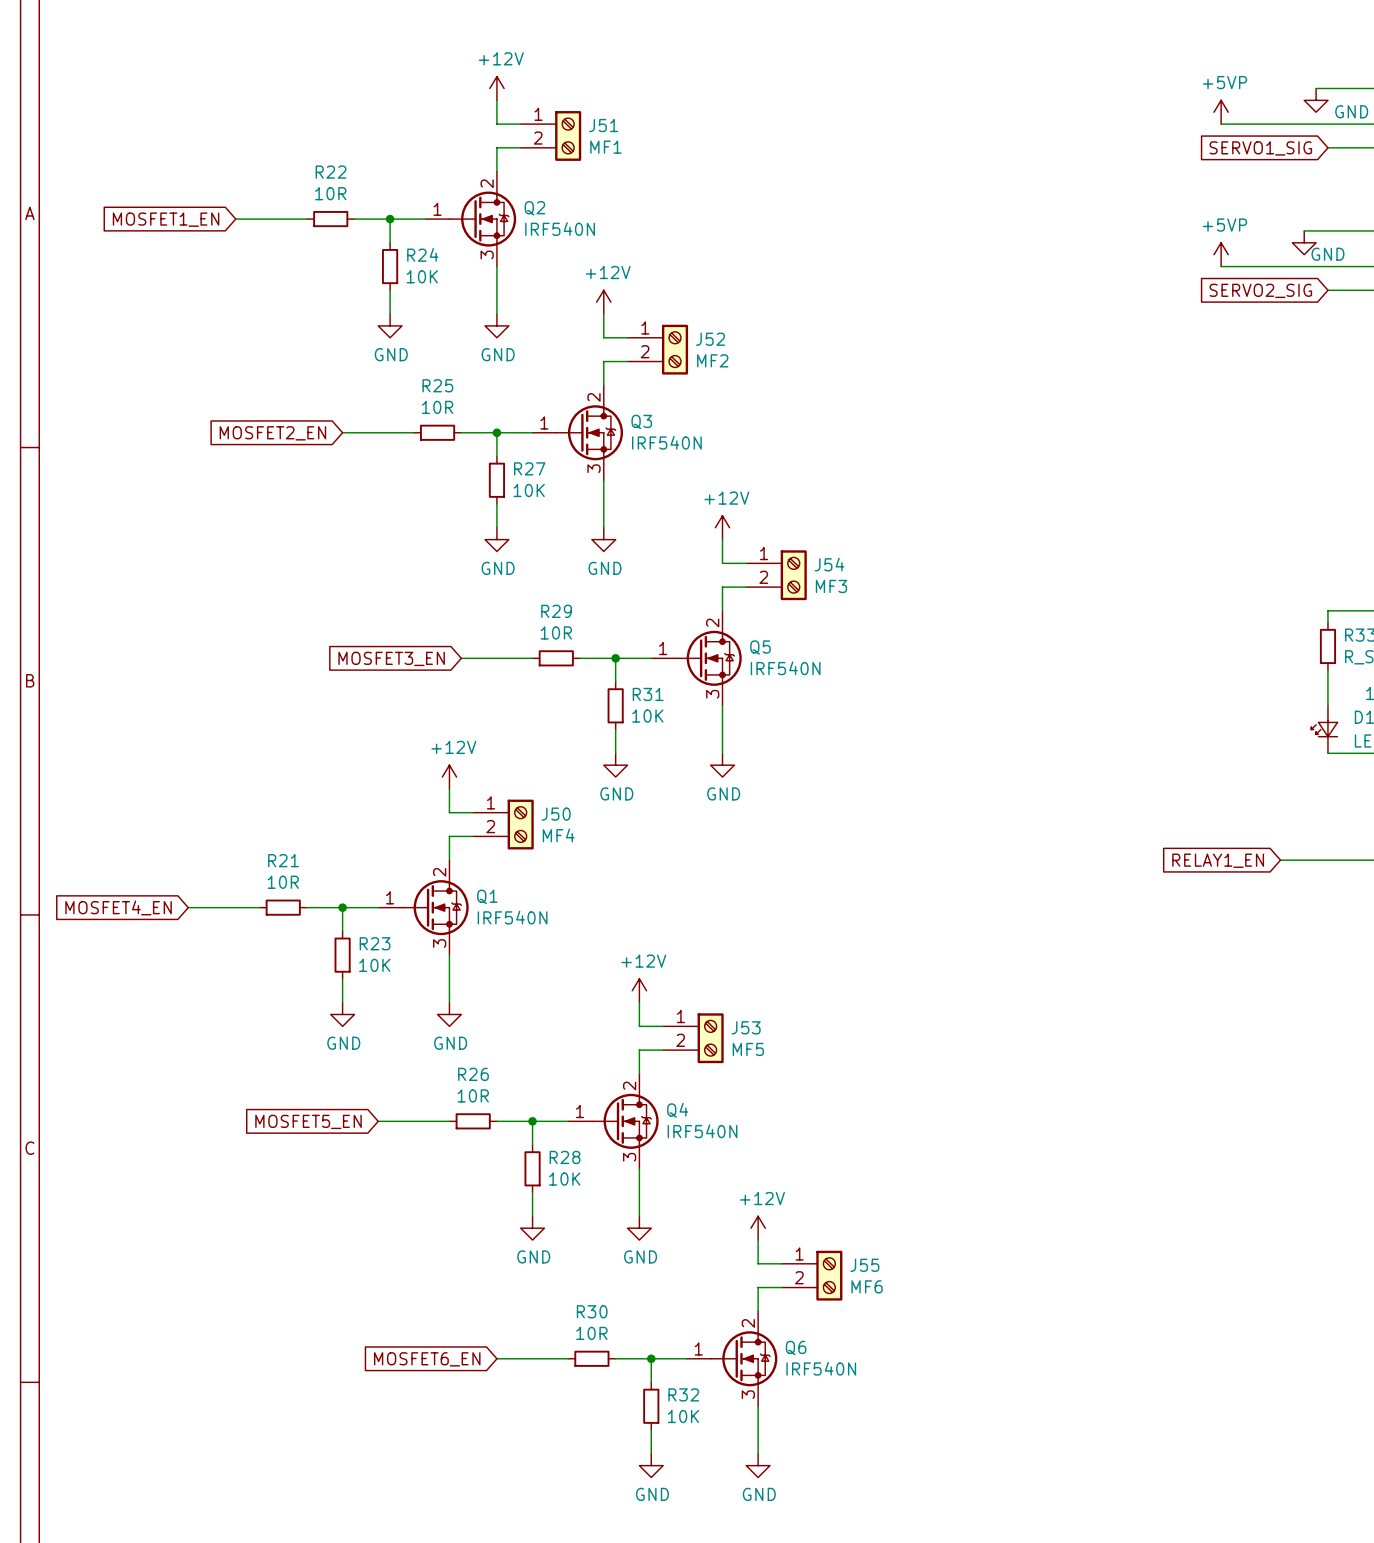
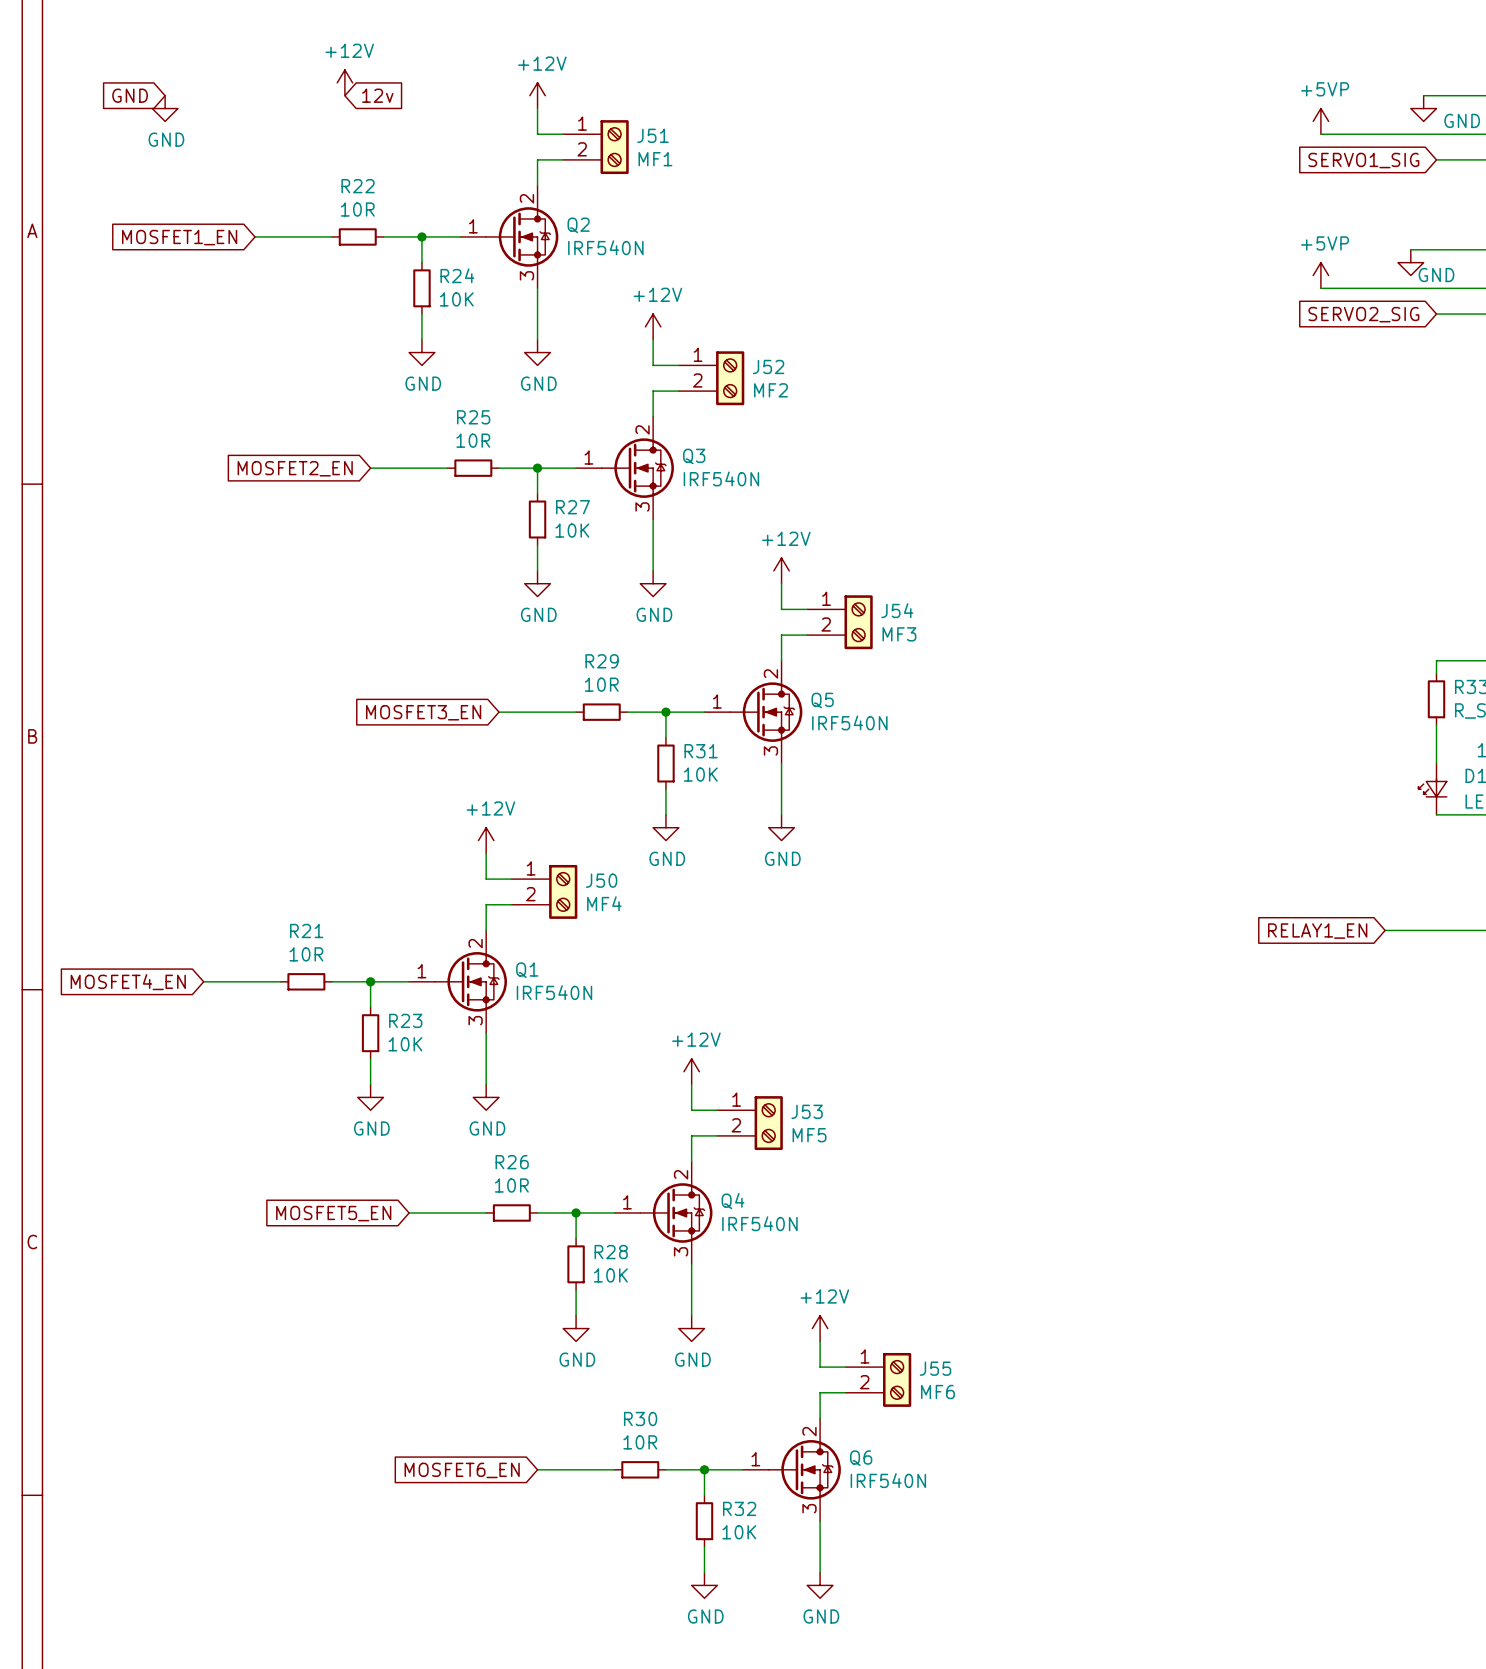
power symbol: none -> +12V (344, 82)
global label: none -> GND (130, 95)
global label: none -> 12v (377, 95)
power symbol: none -> GND (165, 108)

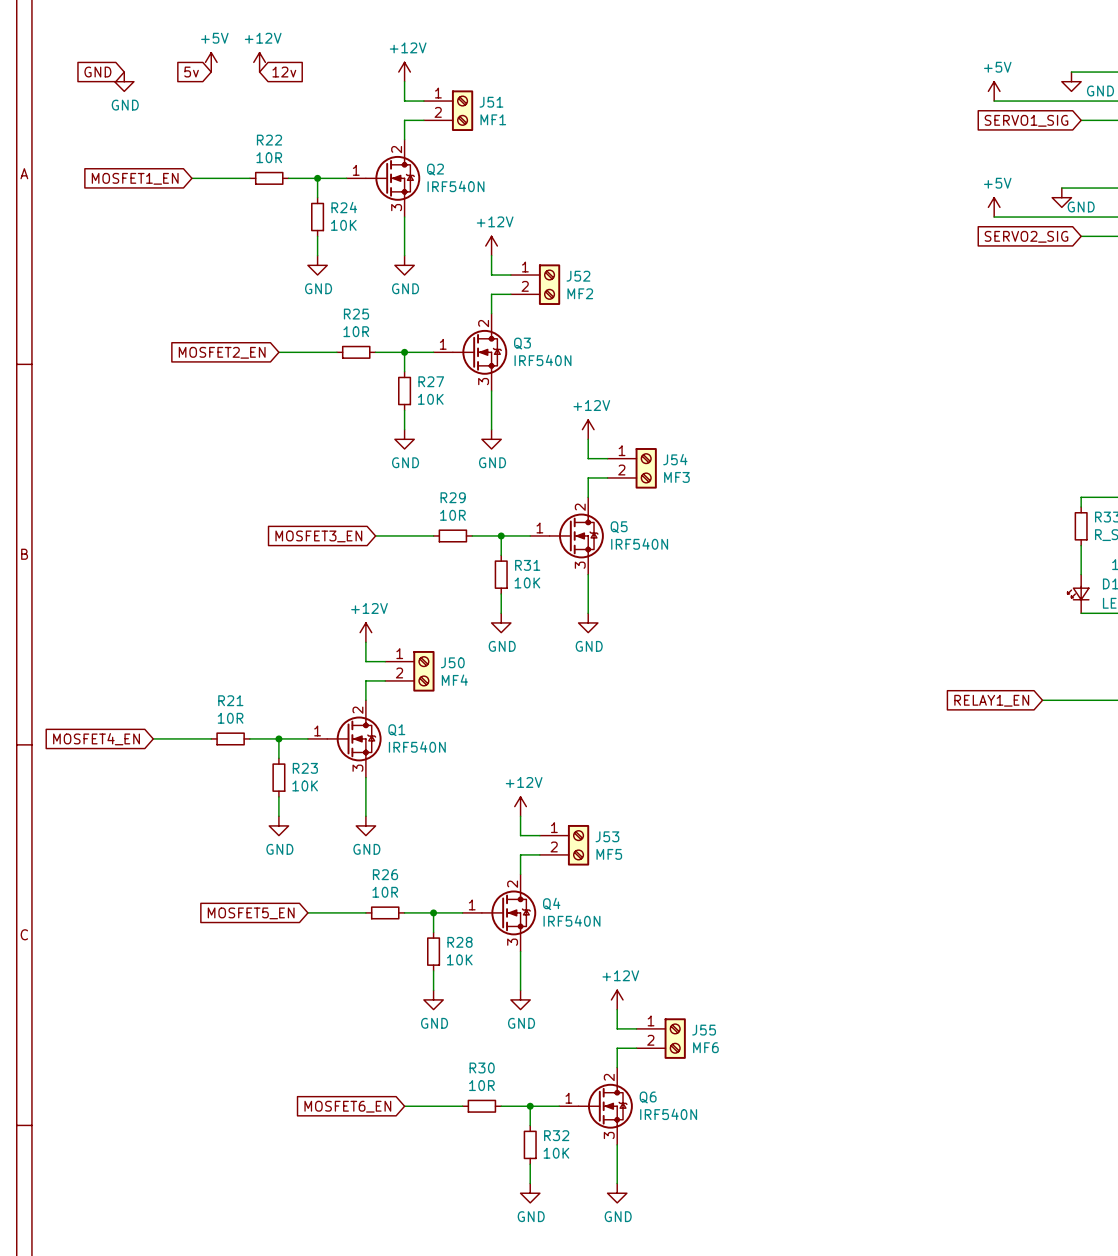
power symbol: none -> +5V (211, 62)
global label: none -> 5v (191, 72)
power symbol: +5VP (1320, 121) -> +5V (994, 91)
power symbol: +5VP (1320, 275) -> +5V (994, 207)

